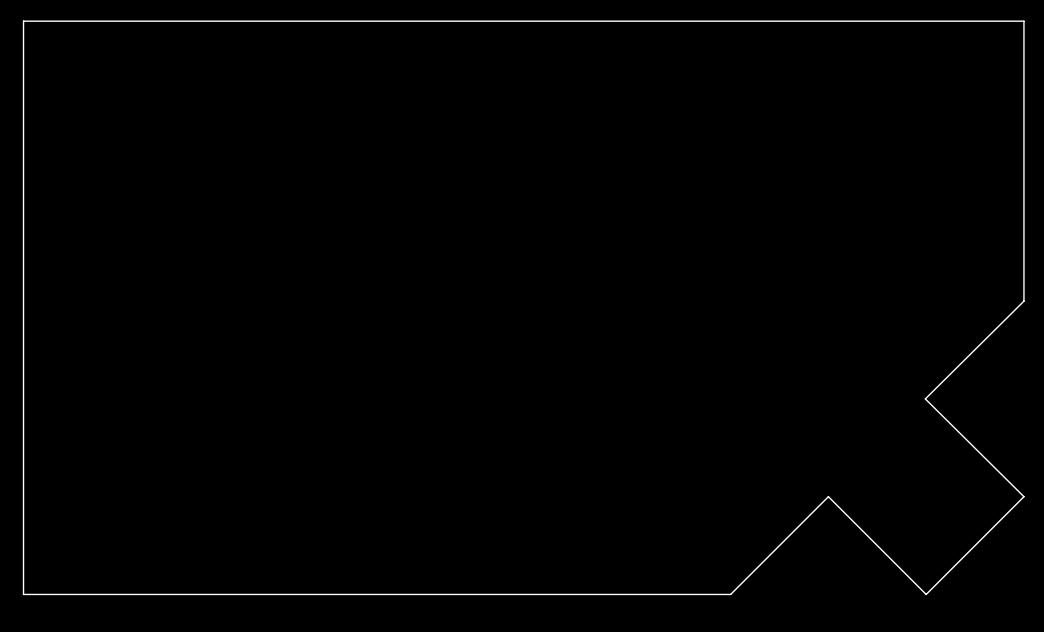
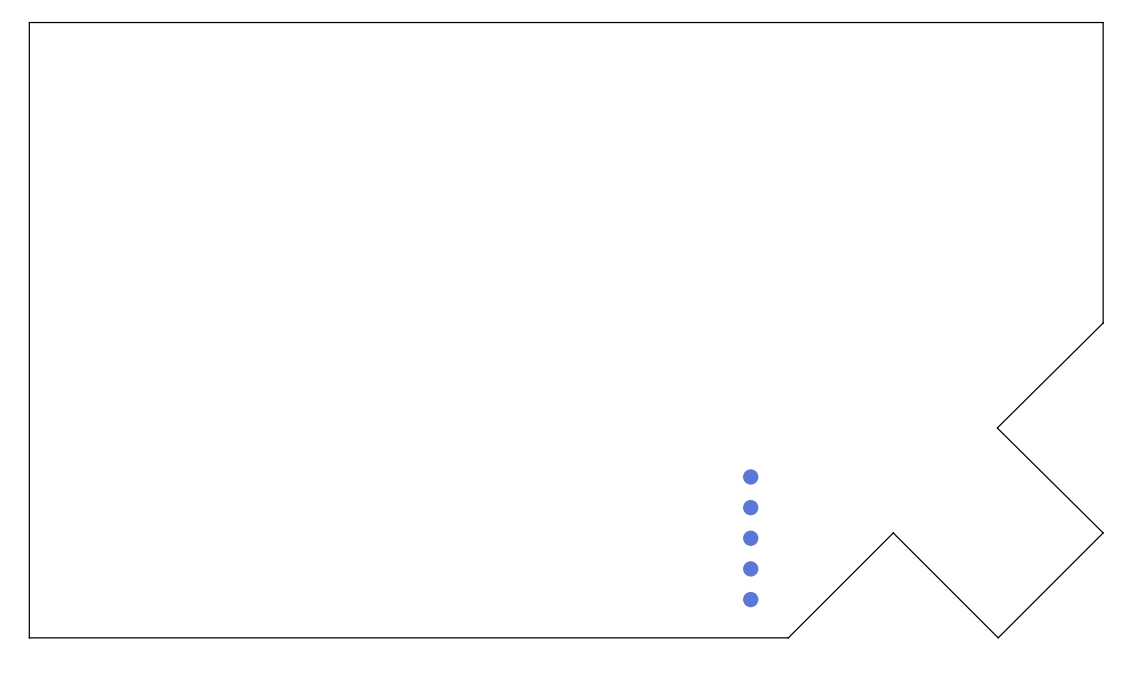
part: none -> (750, 476)
part: none -> (750, 507)
part: none -> (750, 538)
part: none -> (750, 568)
part: none -> (750, 599)

